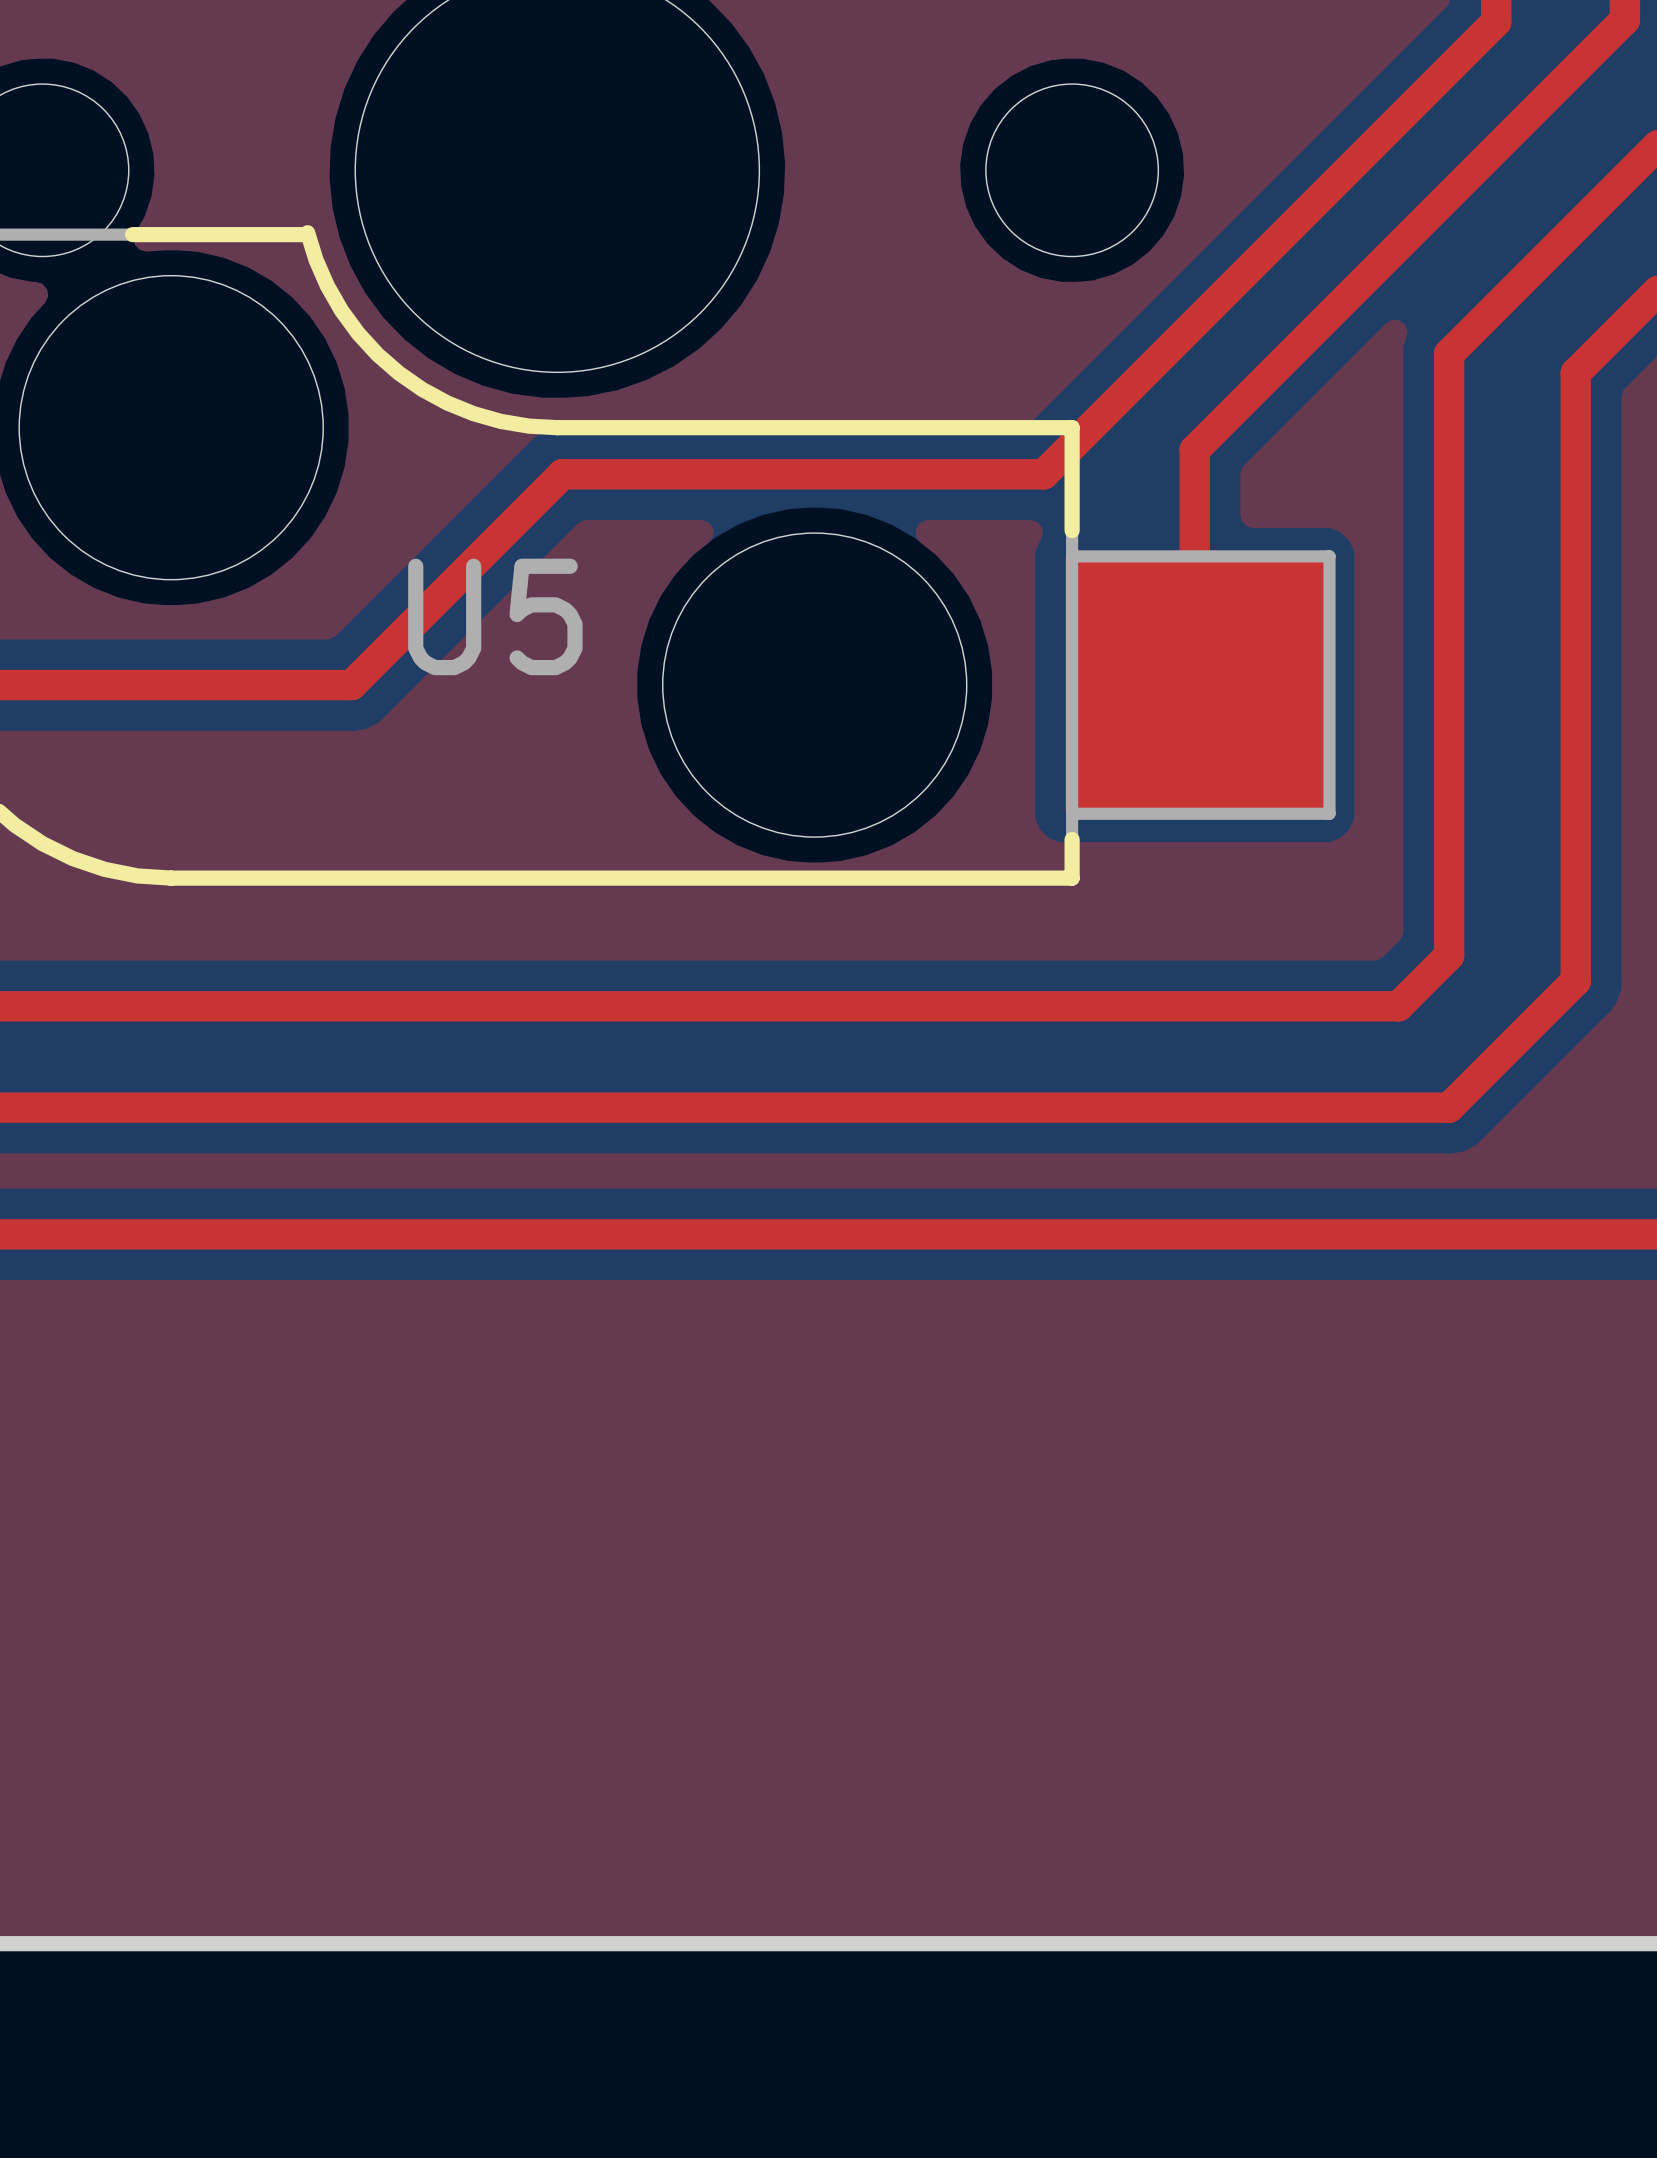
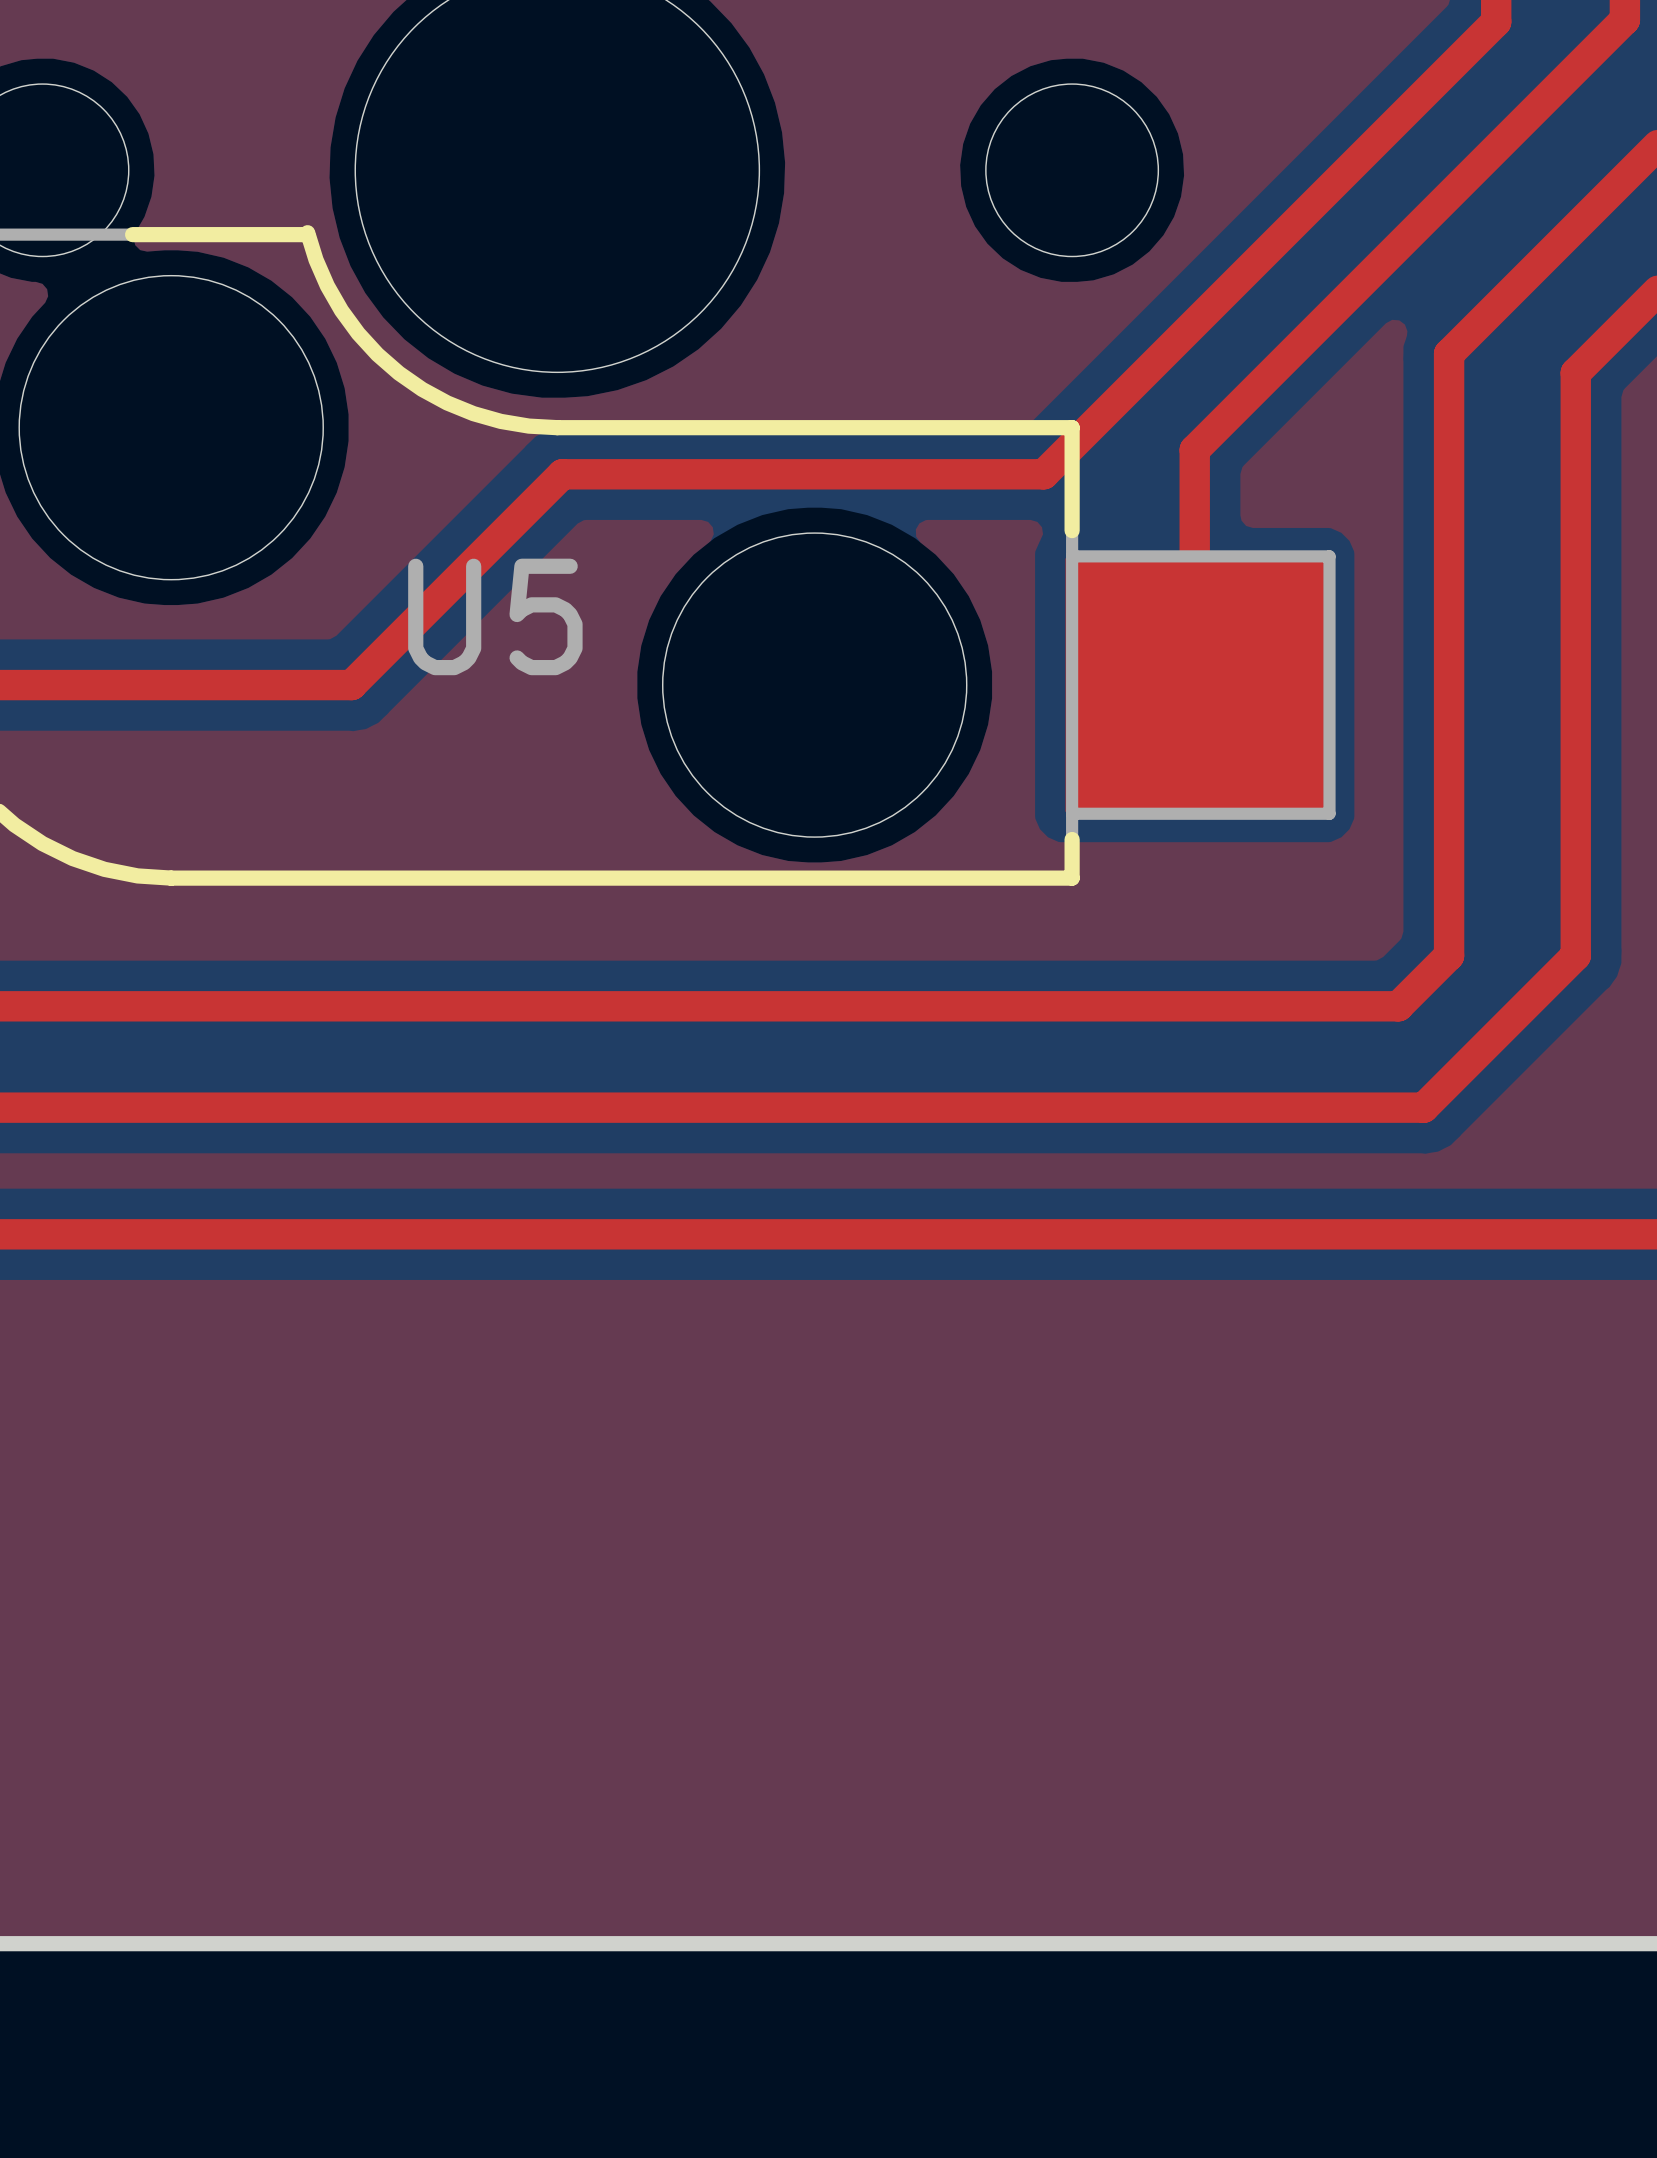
top track: (1575, 955) (1575, 980) (1449, 1107) (1423, 1107) -> (1575, 955) (1423, 1107)

